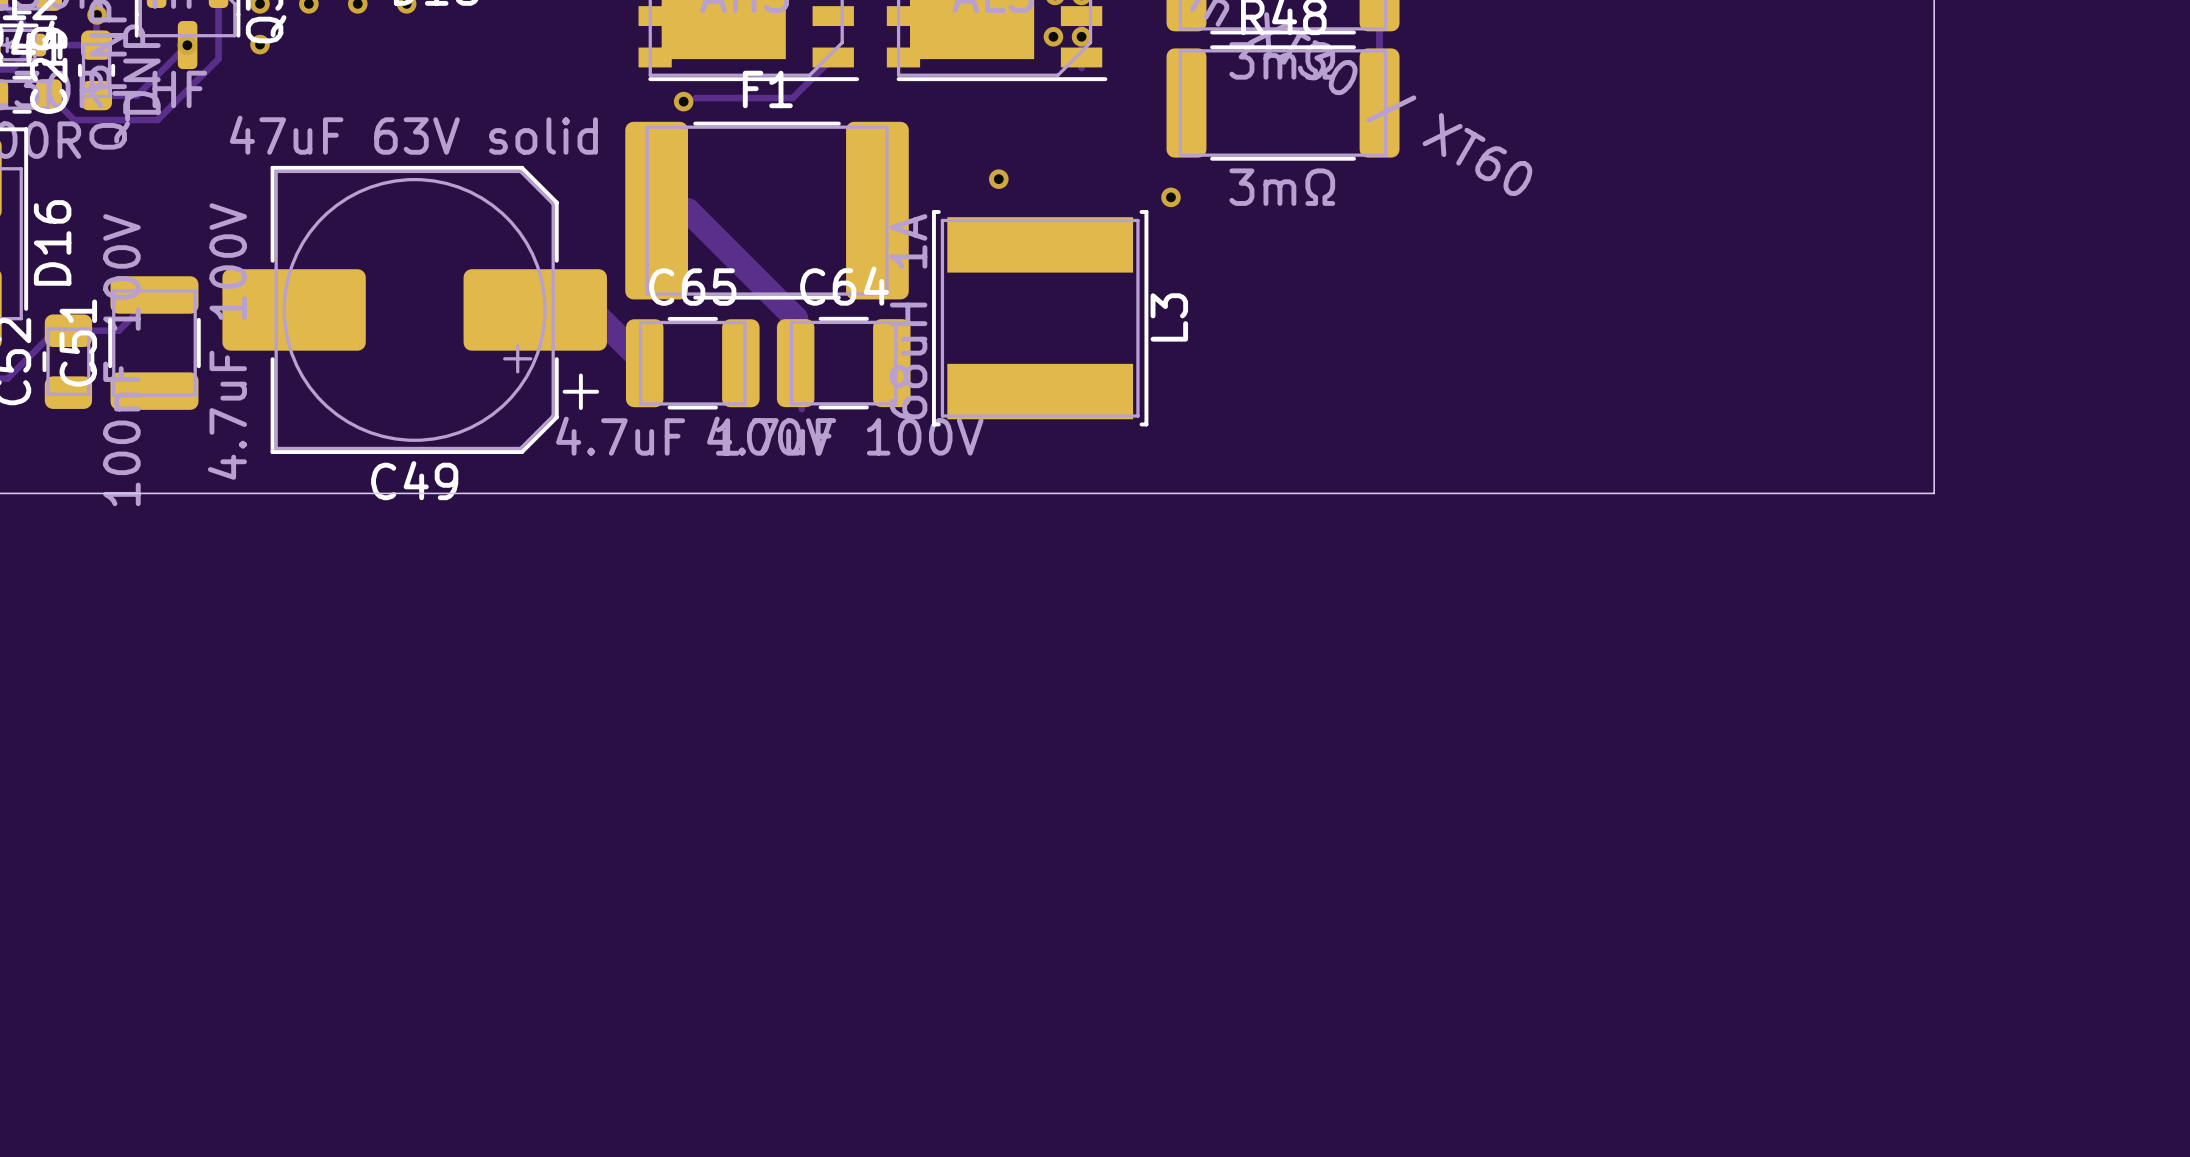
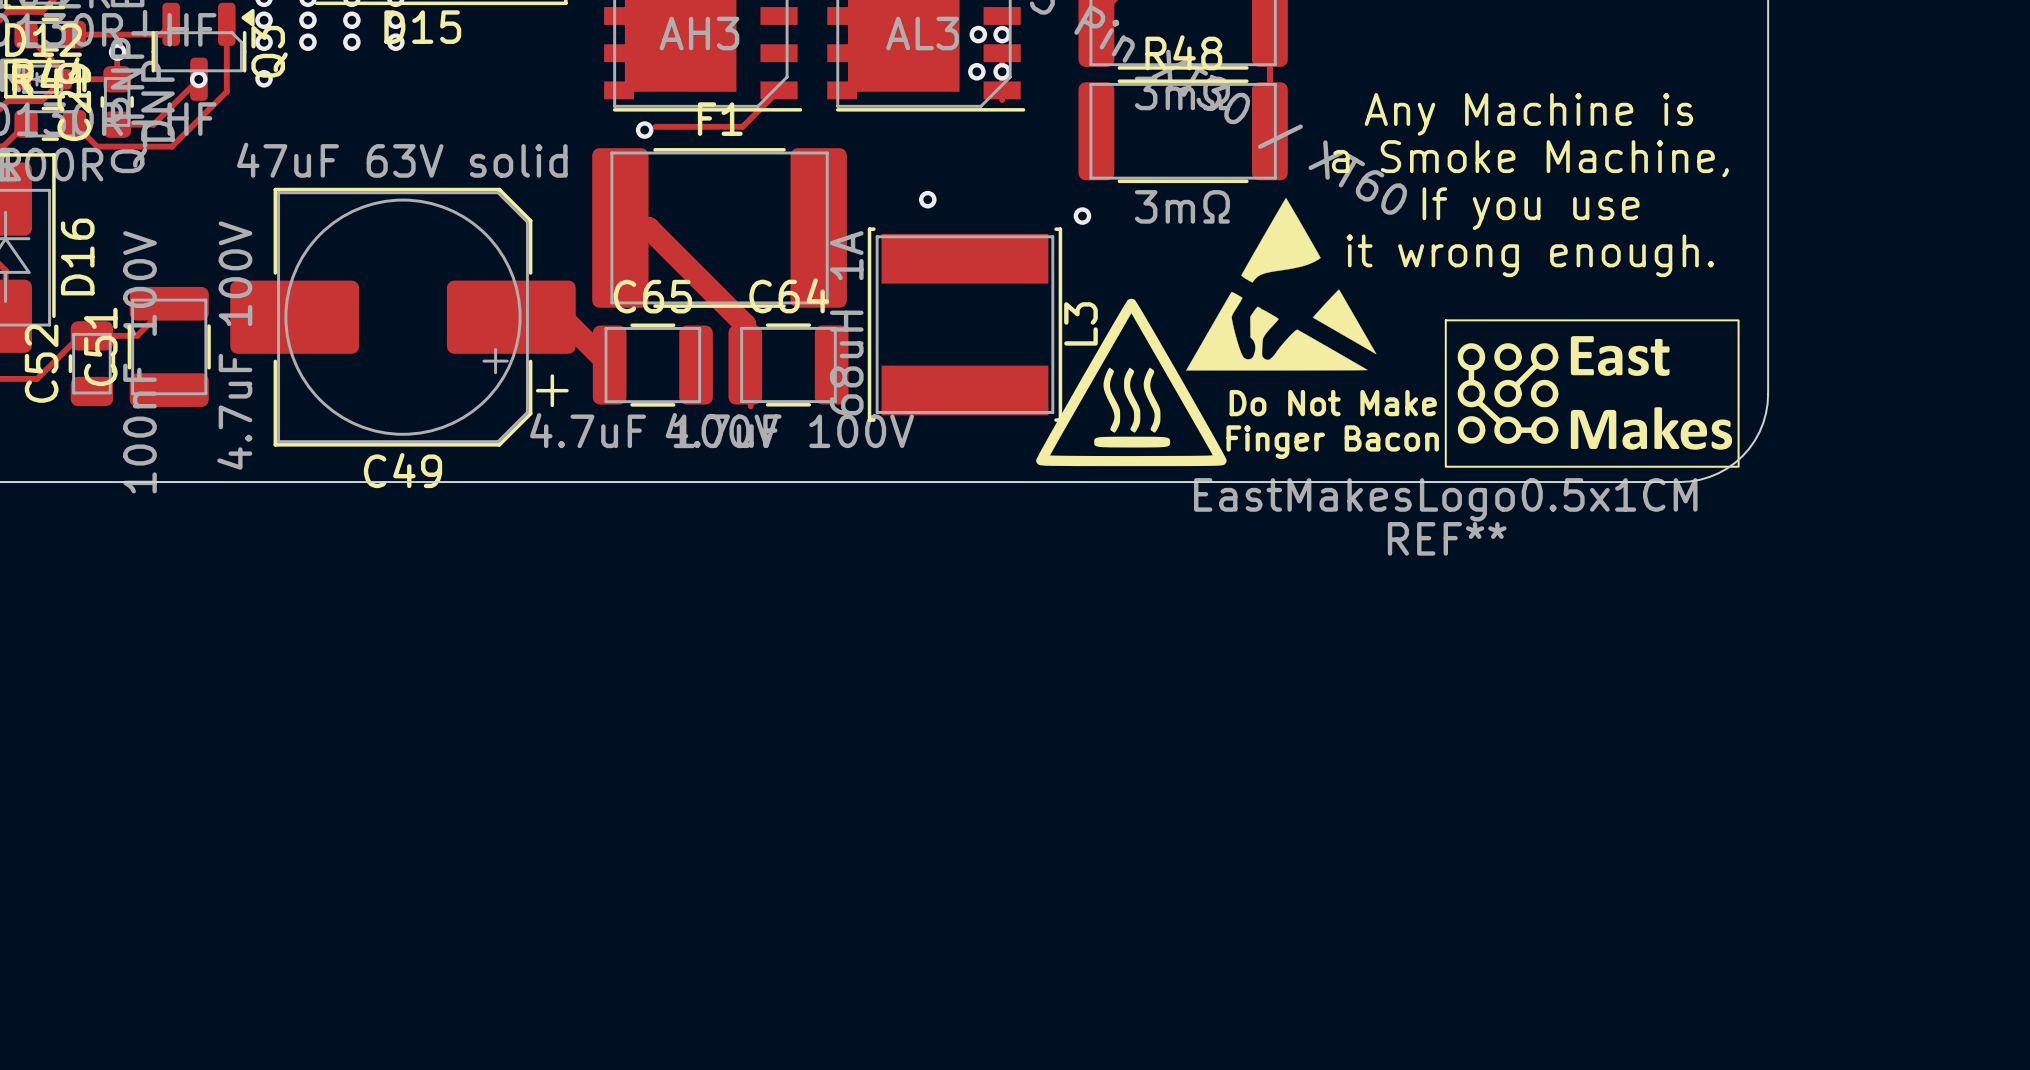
text: none -> Any Machine is (1528, 114)
text: none -> a Smoke Machine, (1530, 158)
drawing: none -> [1036, 197, 1377, 467]
text: none -> If you use (1531, 208)
text: none -> it wrong enough. (1530, 255)
REF**: none -> EastMakesLogo0.5x1CM (1592, 393)
board edge: (1934, 395) (1934, 493) (1836, 493) -> (1768, 394) (1763, 423) (1754, 440) (1742, 456) (1718, 473) (1699, 479) (1680, 482)
text: none -> Do Not Make (1333, 403)
text: none -> Finger Bacon (1332, 442)

